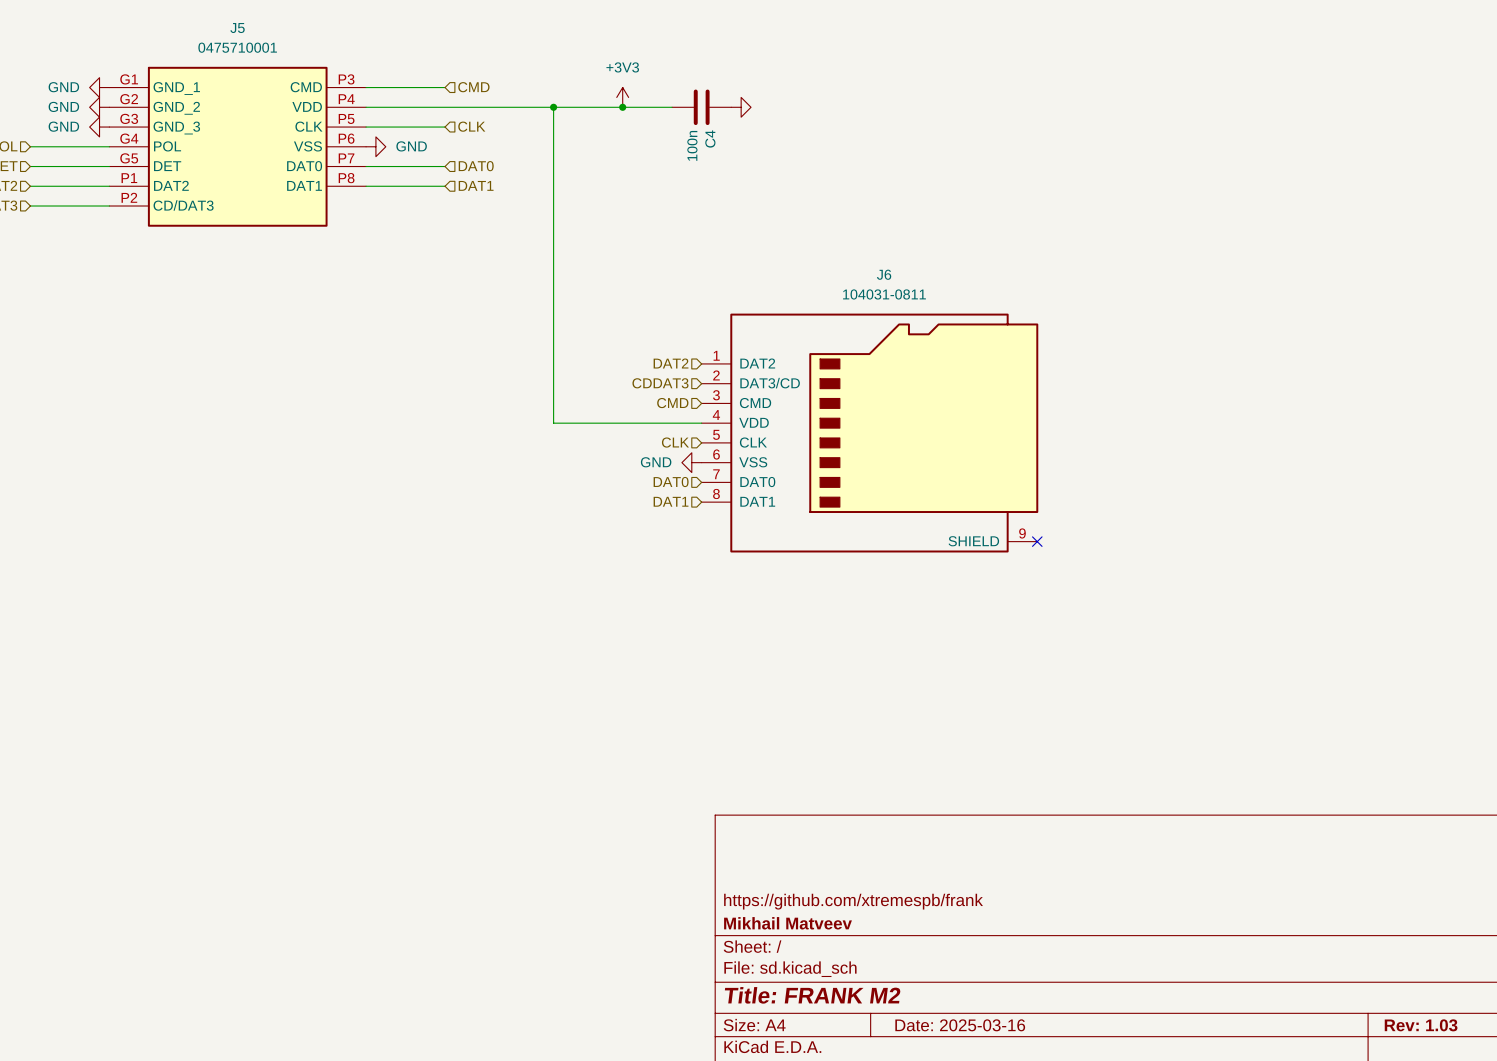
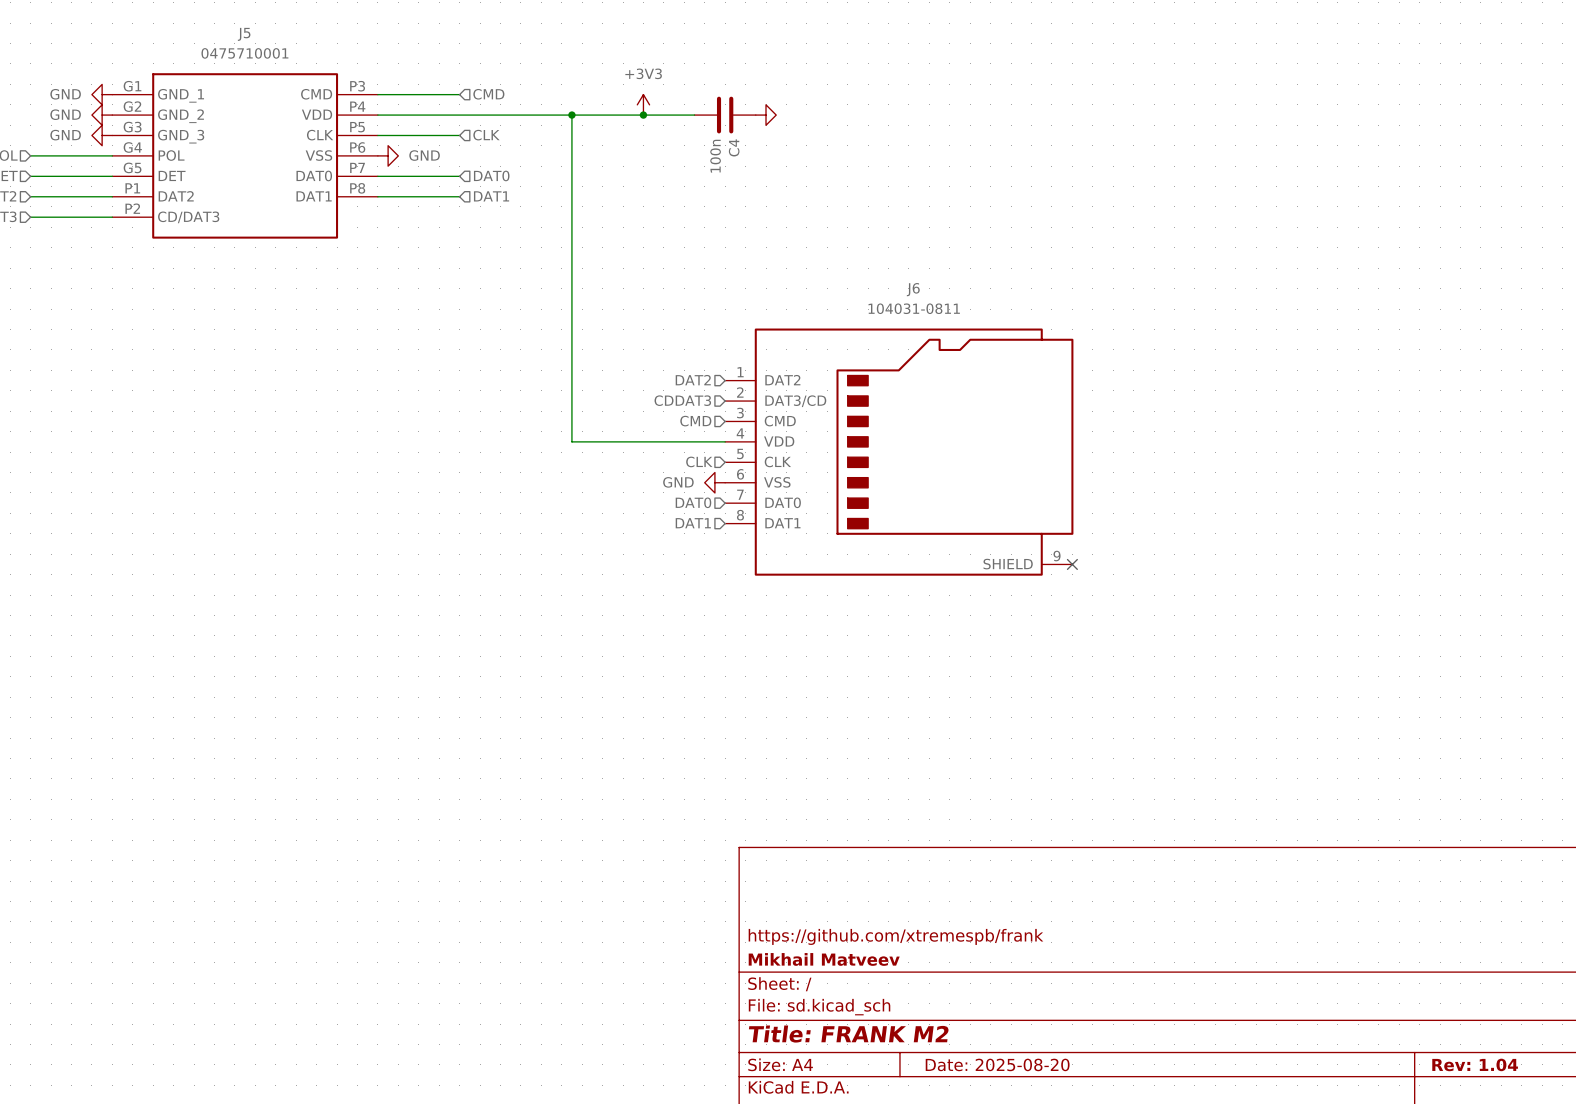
title block: Date: 2025-03-16 (960, 1025) -> Date: 2025-08-20 (997, 1064)
title block: Rev: 1.03 (1421, 1025) -> Rev: 1.04 (1475, 1064)

